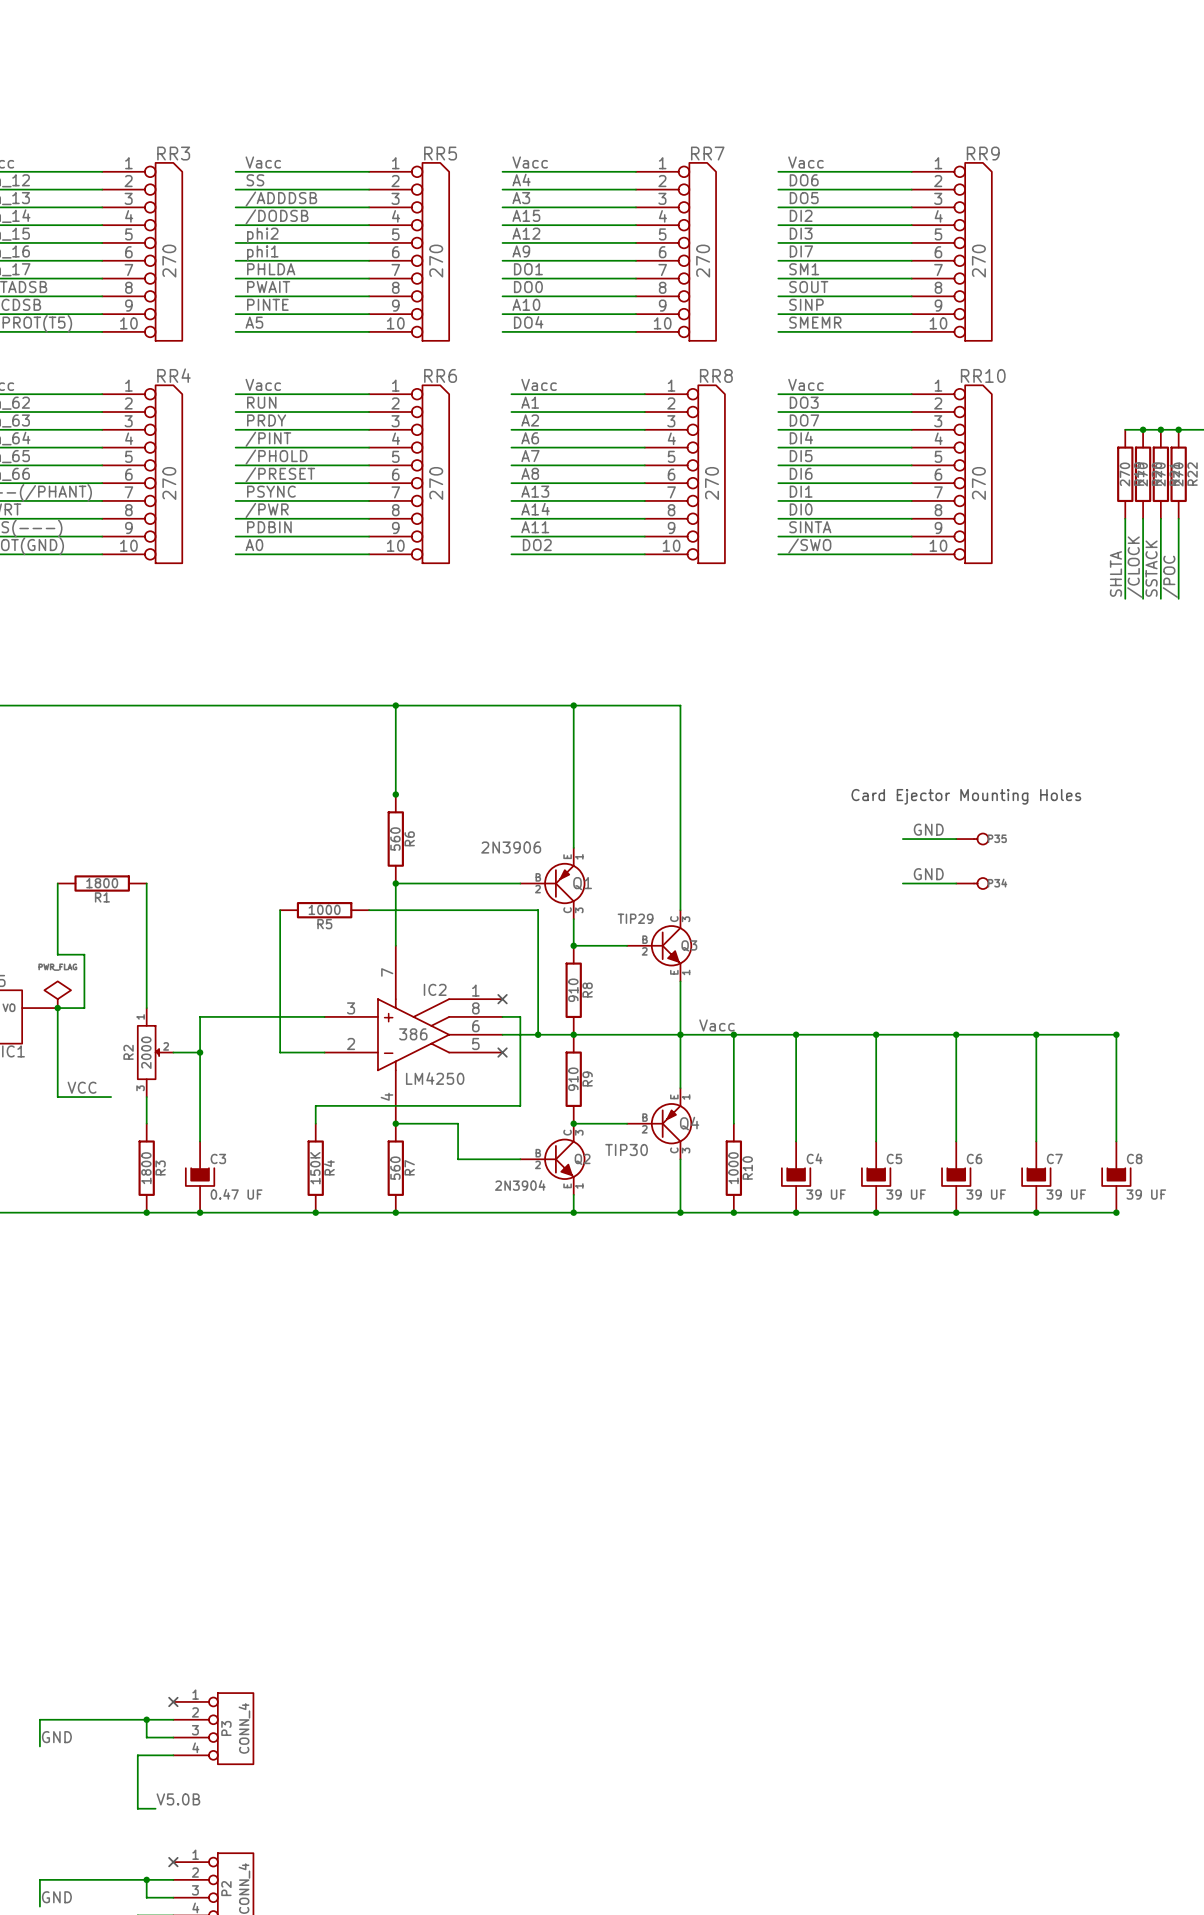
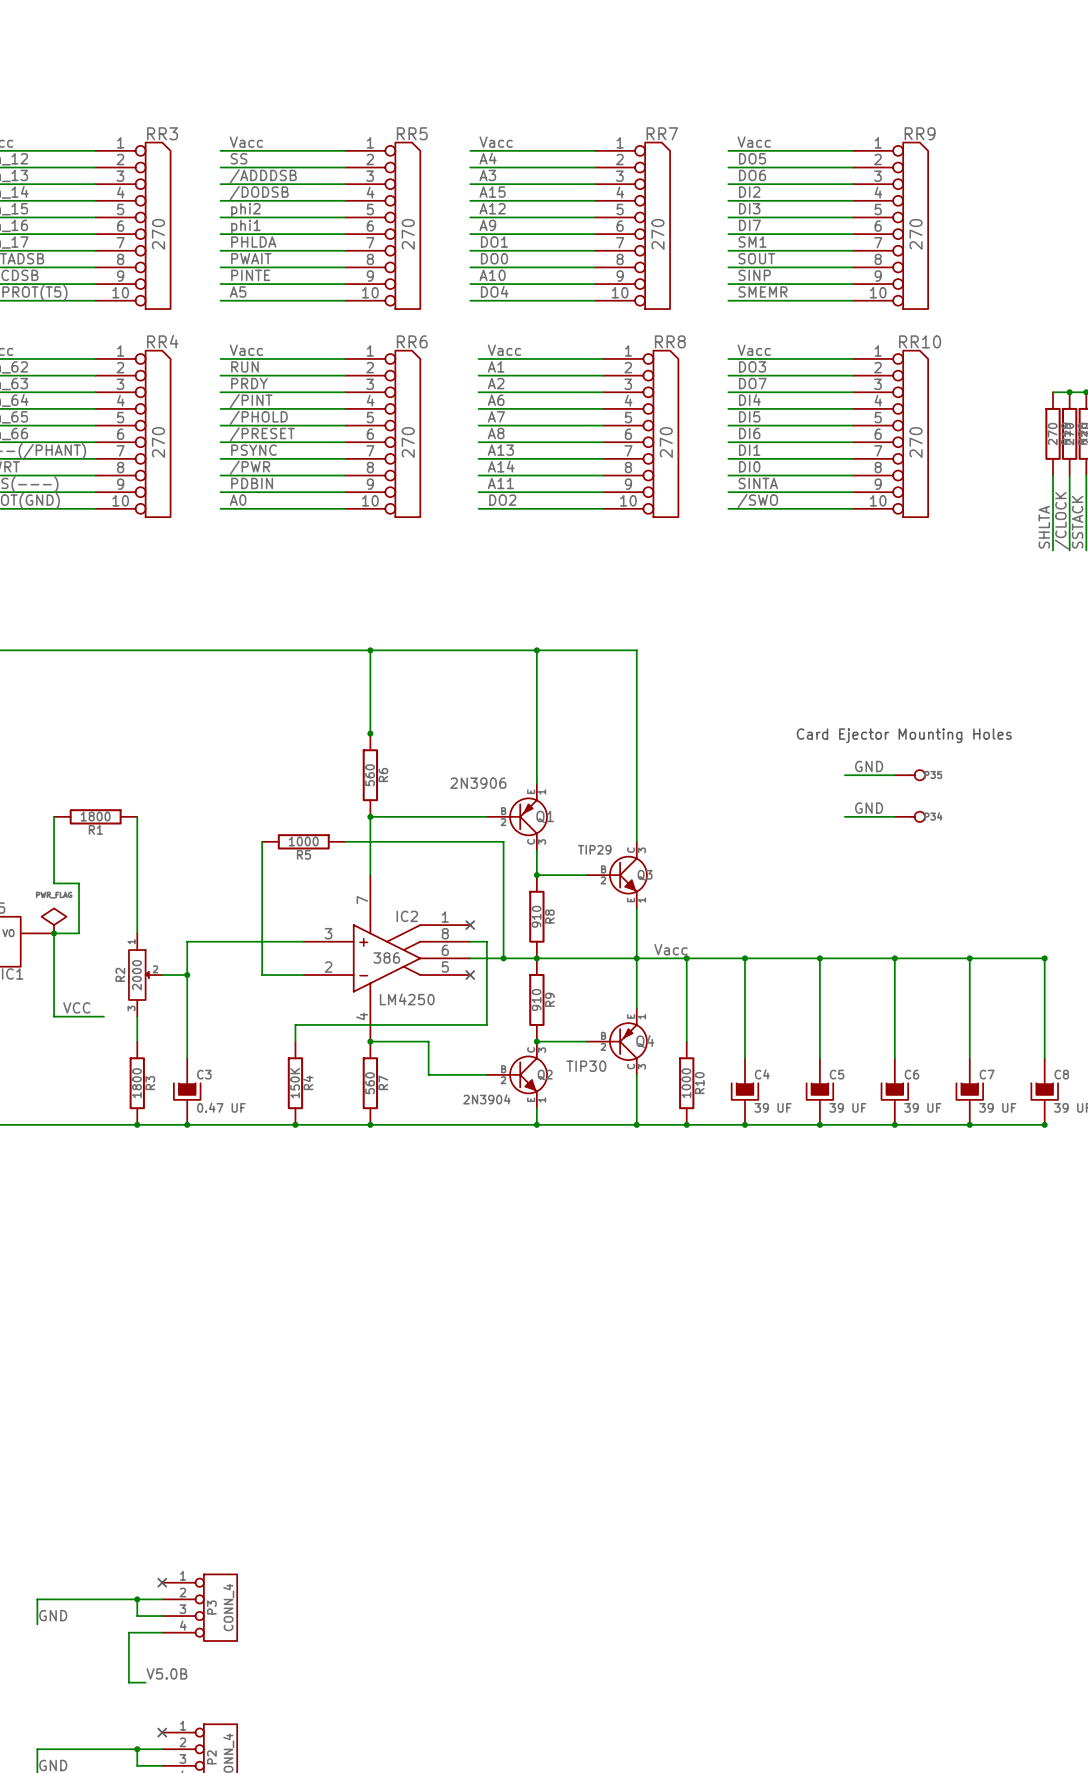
label: DO6 (804, 180) -> DO5 (752, 158)
label: DO5 (804, 198) -> DO6 (752, 175)

